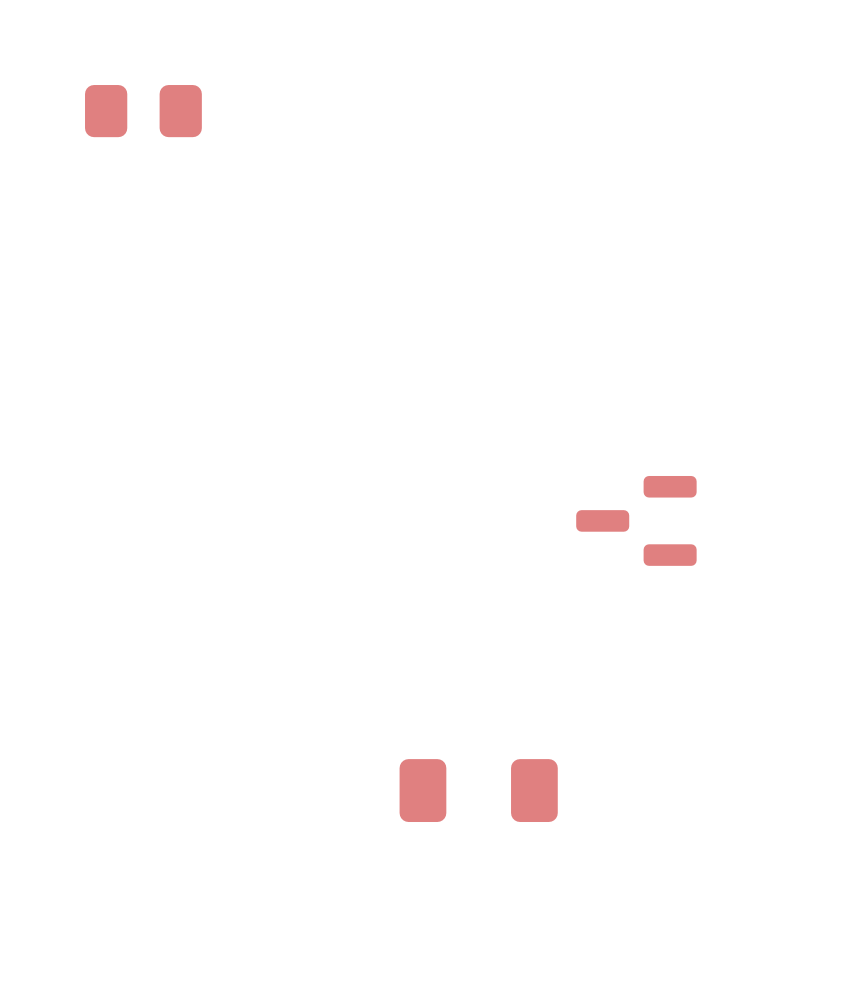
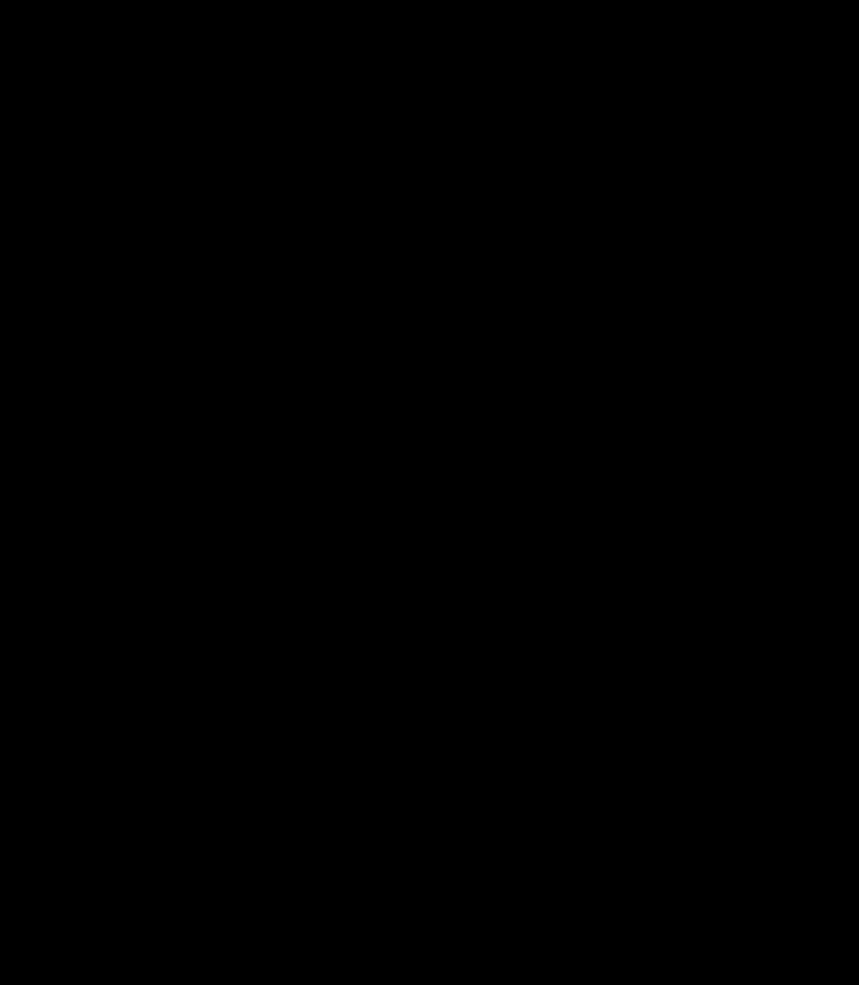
part: (143, 111) -> none
part: (636, 520) -> none
part: (478, 790) -> none

